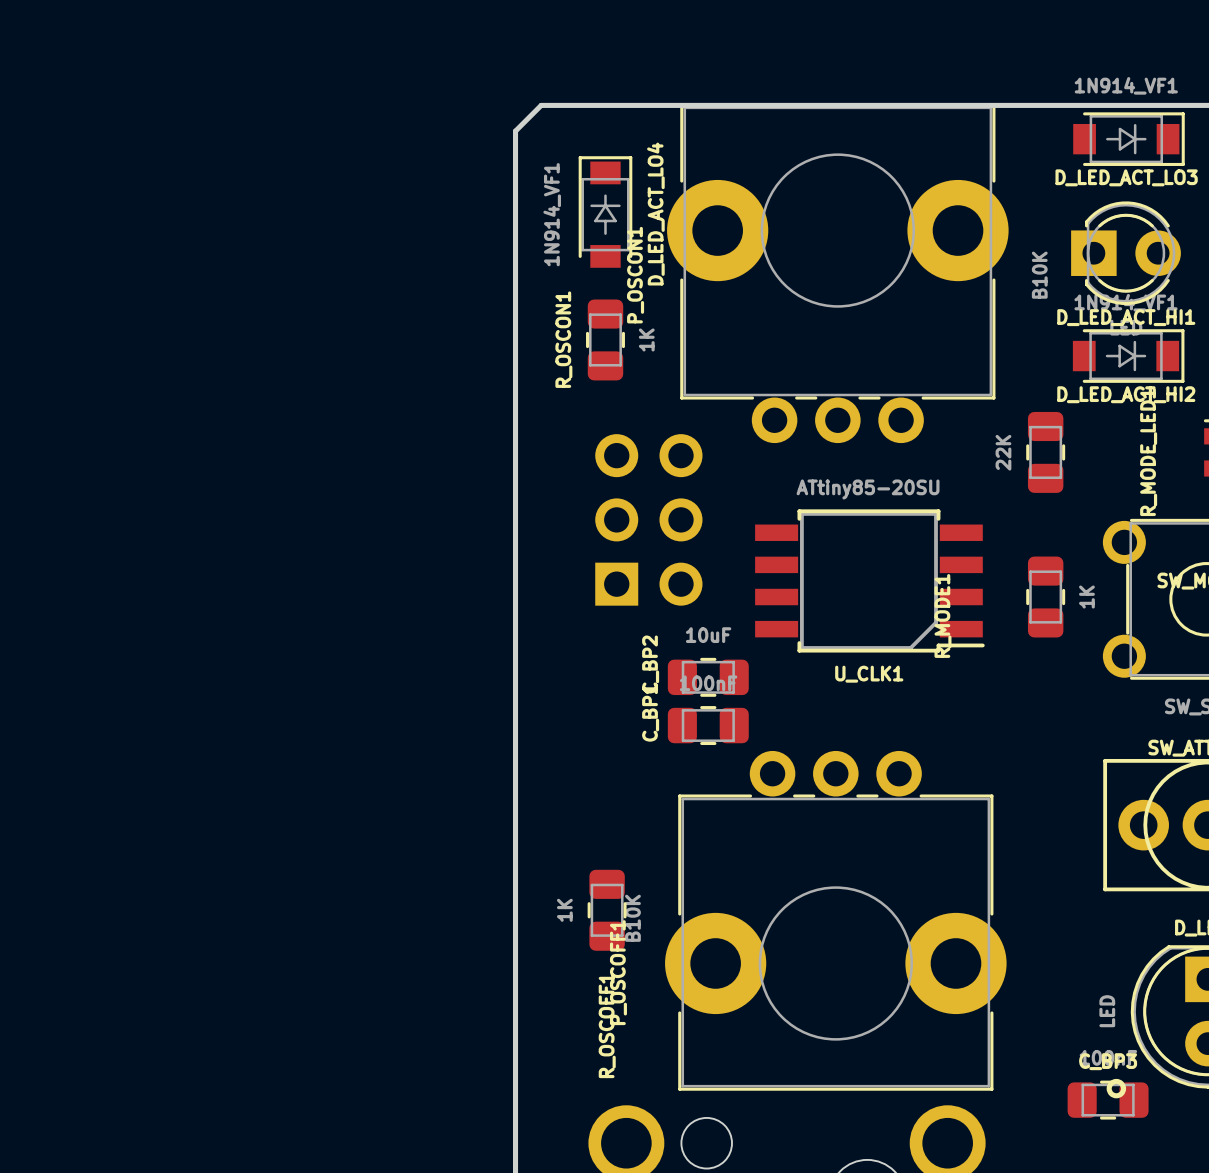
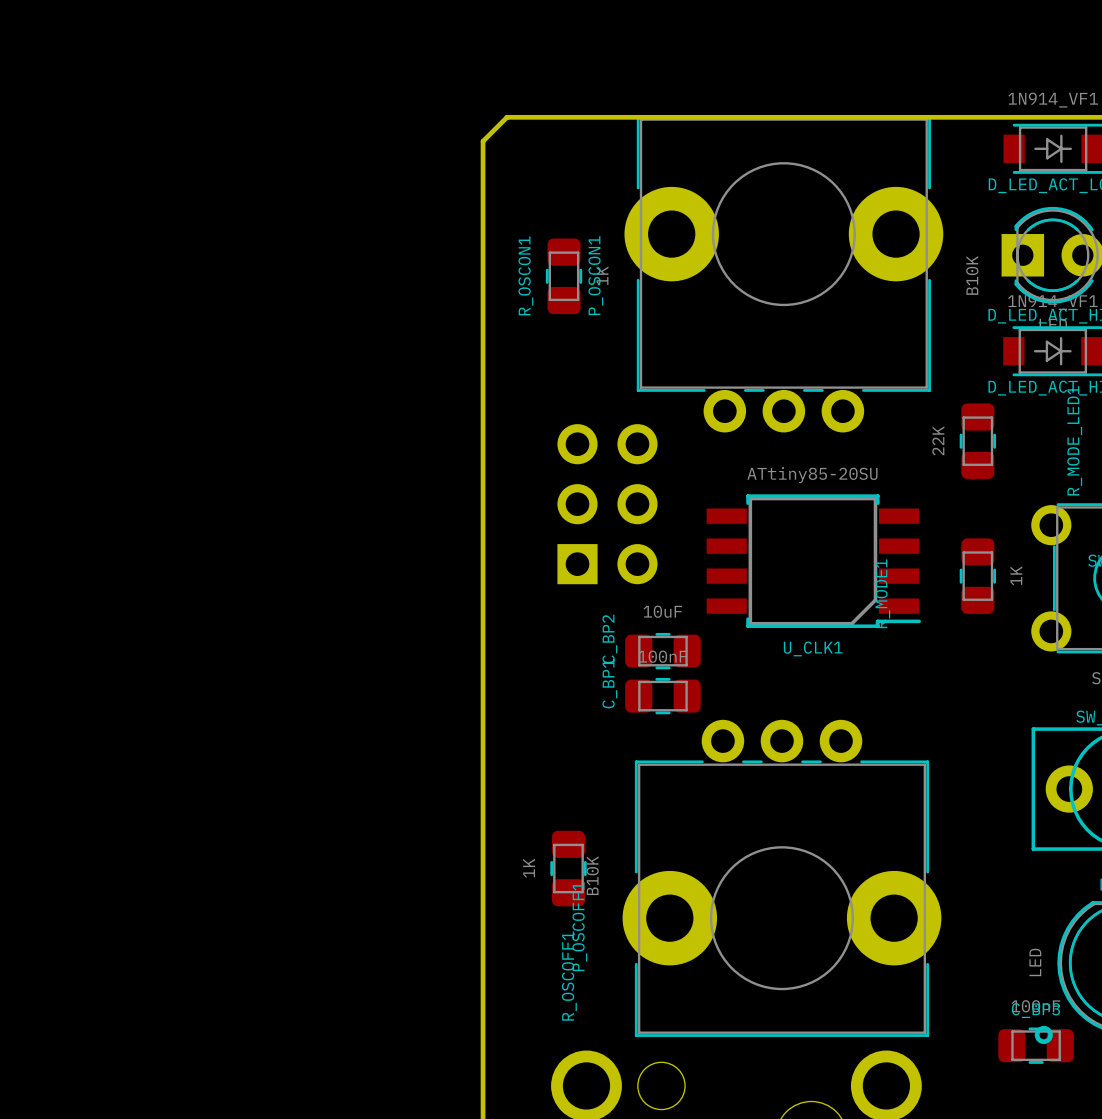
D_LED_ACT_LO4: 1N914_VF1 (605, 212) -> none
R_OSCON1 position: (605, 339) -> (564, 276)

